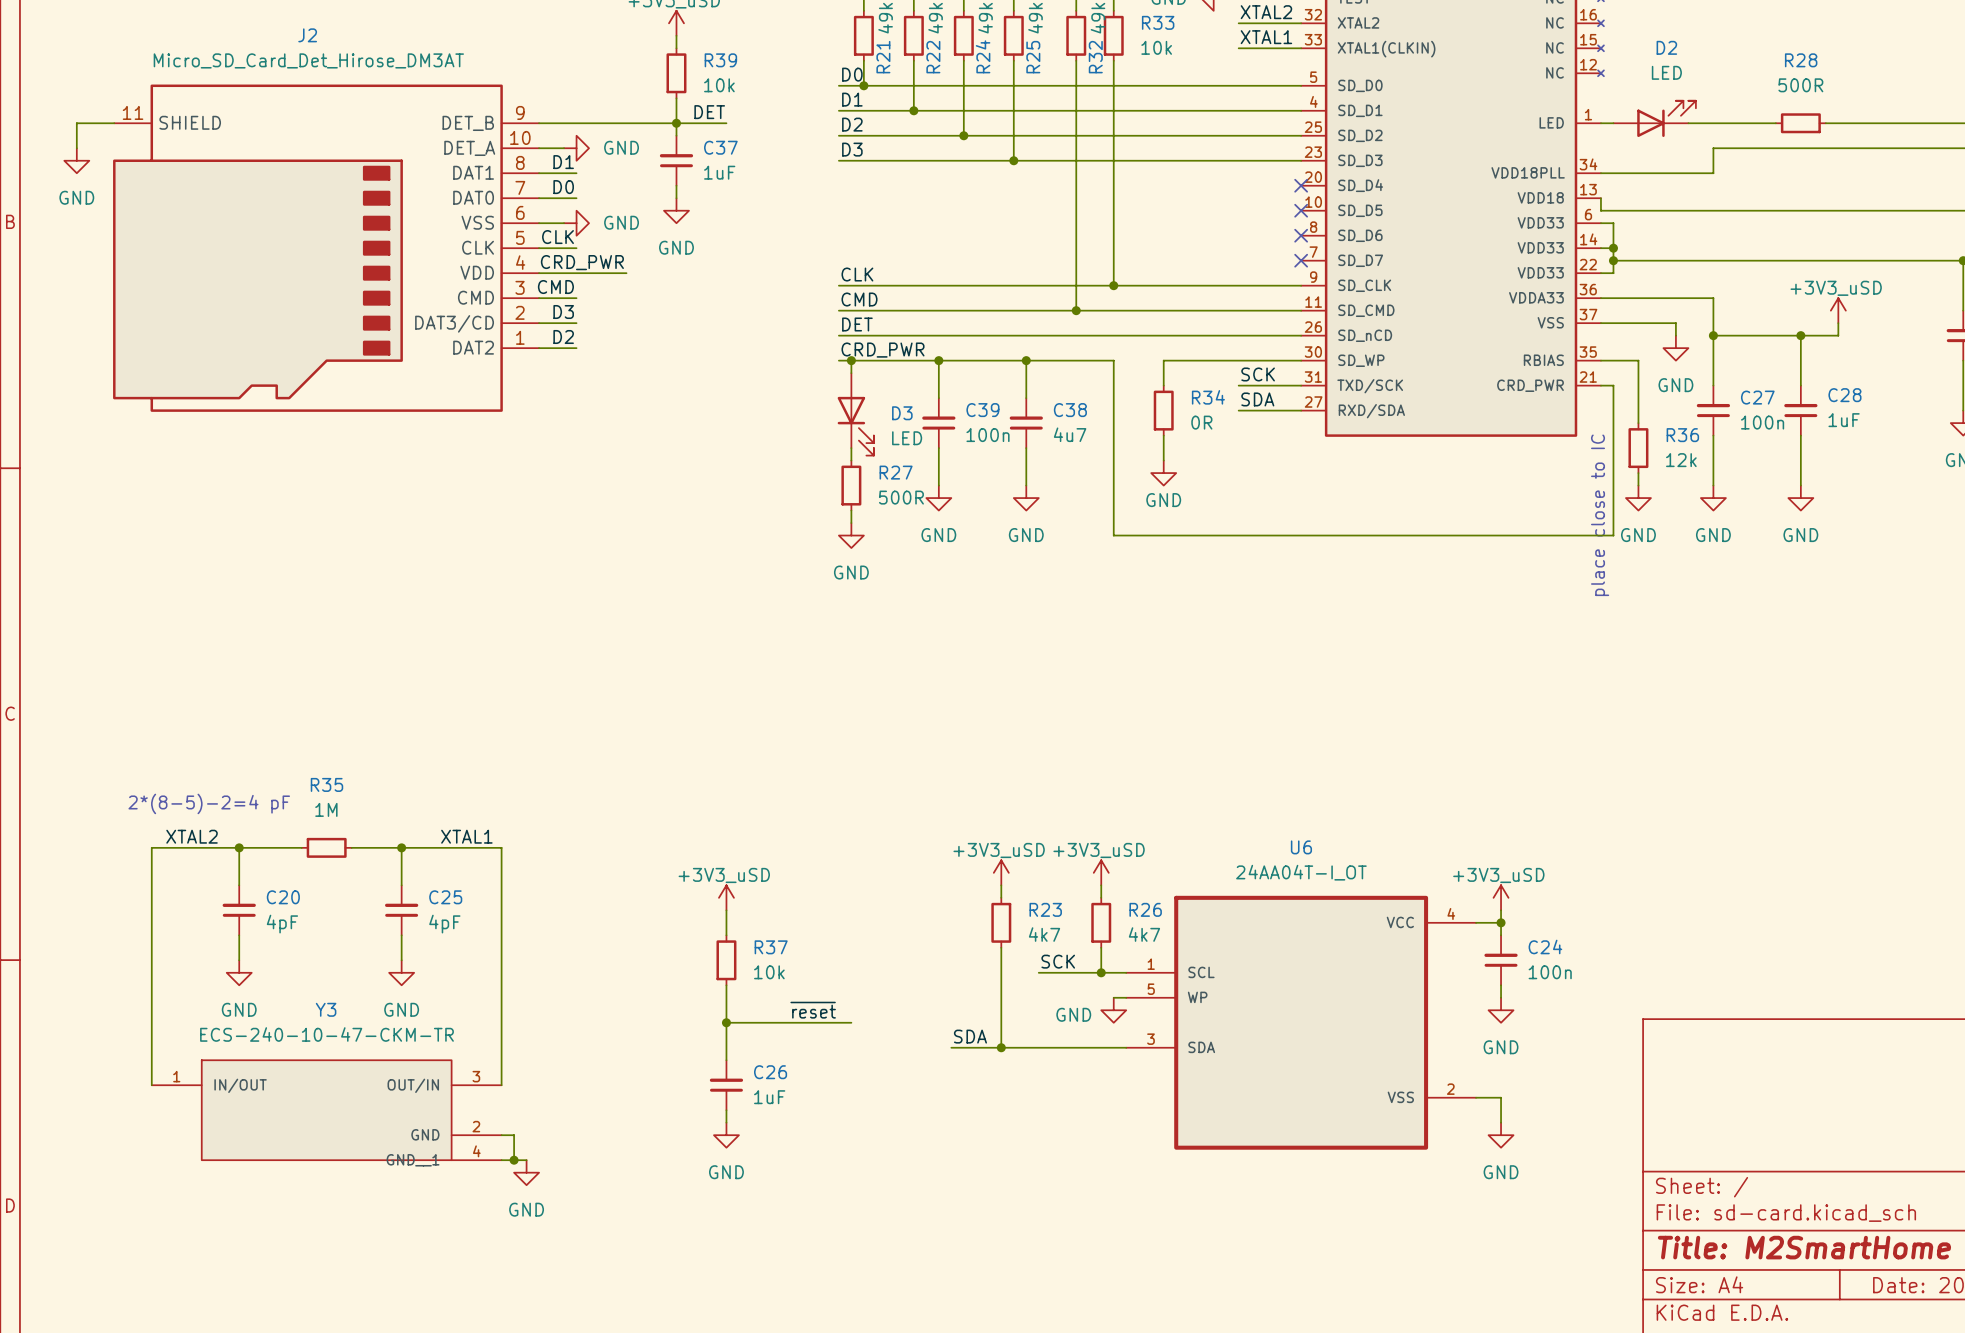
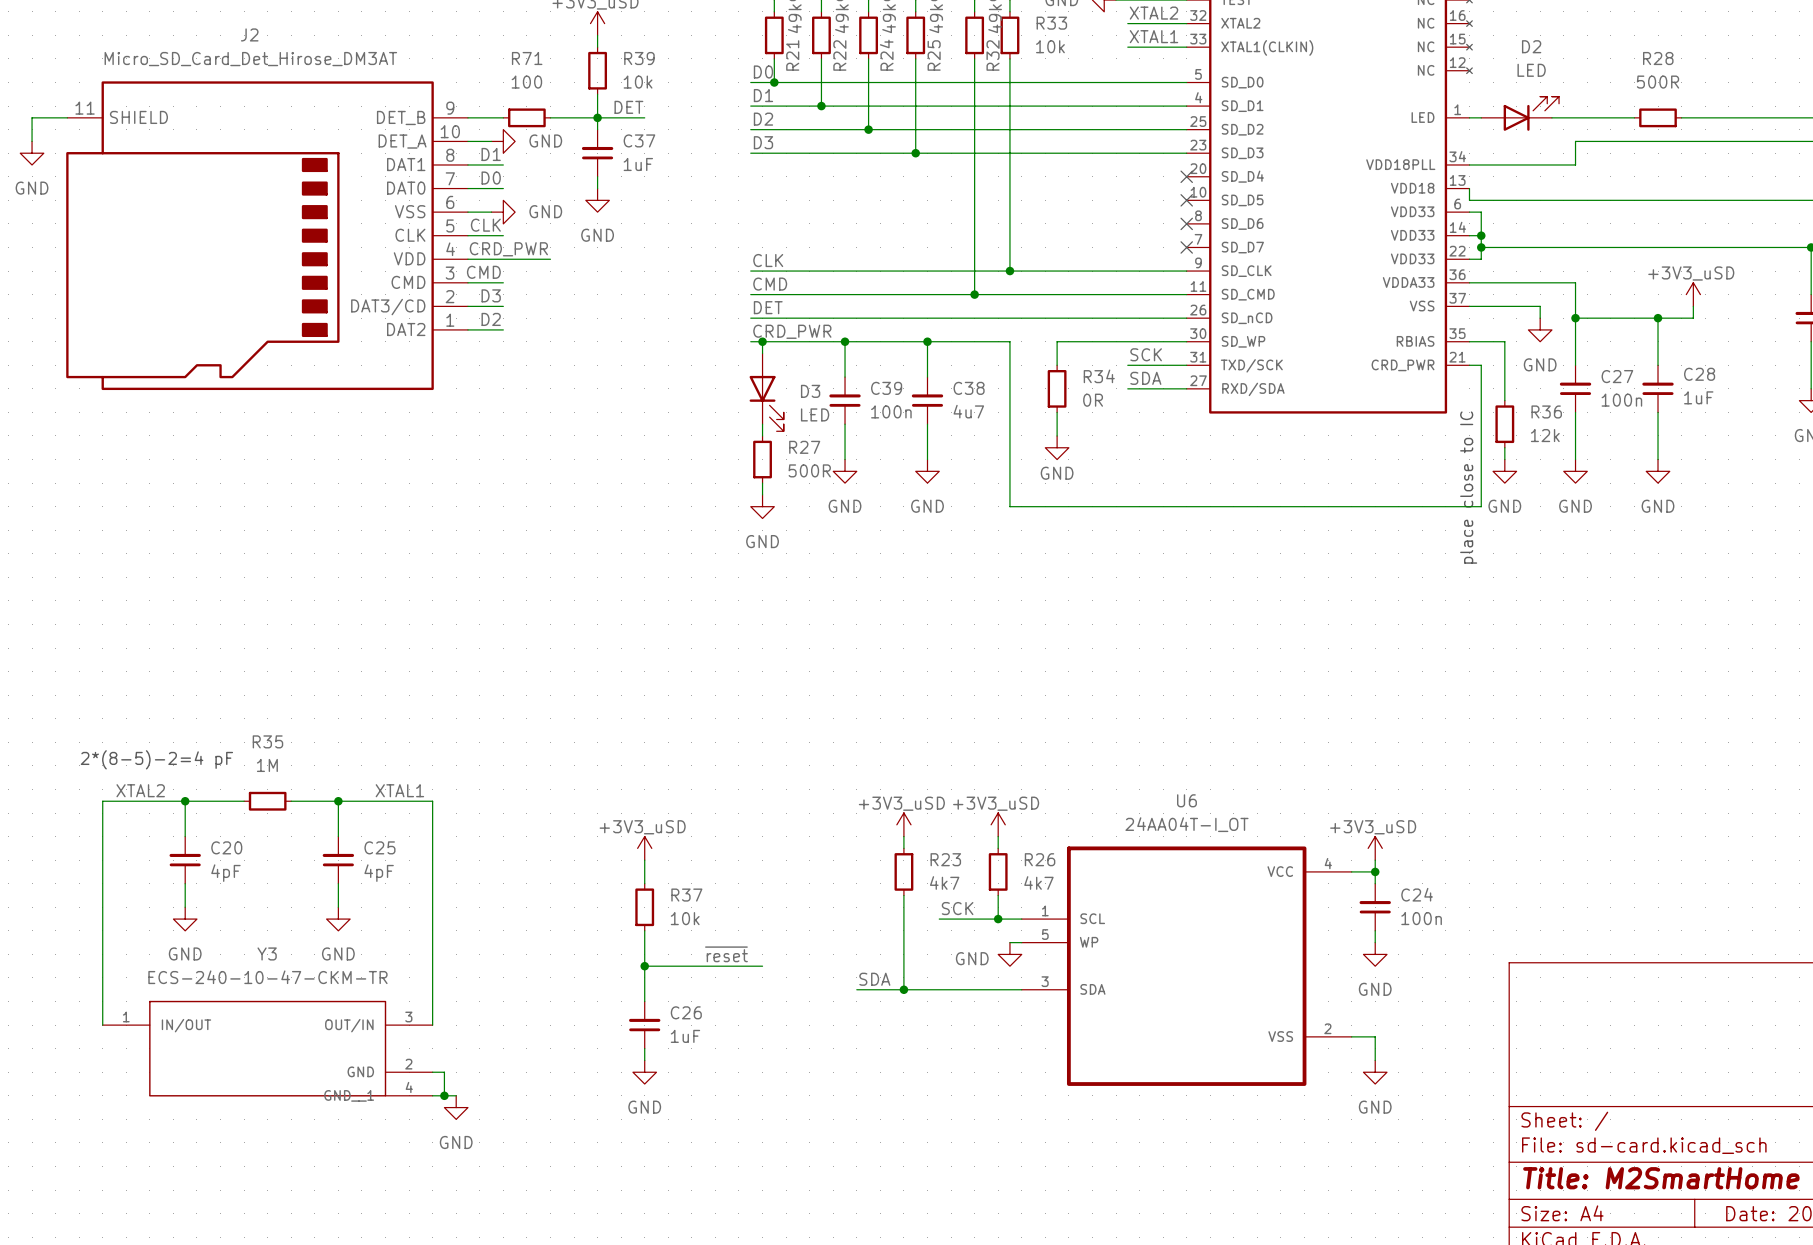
wire: (576, 123) (626, 123) -> none
R71: none -> (526, 117)

